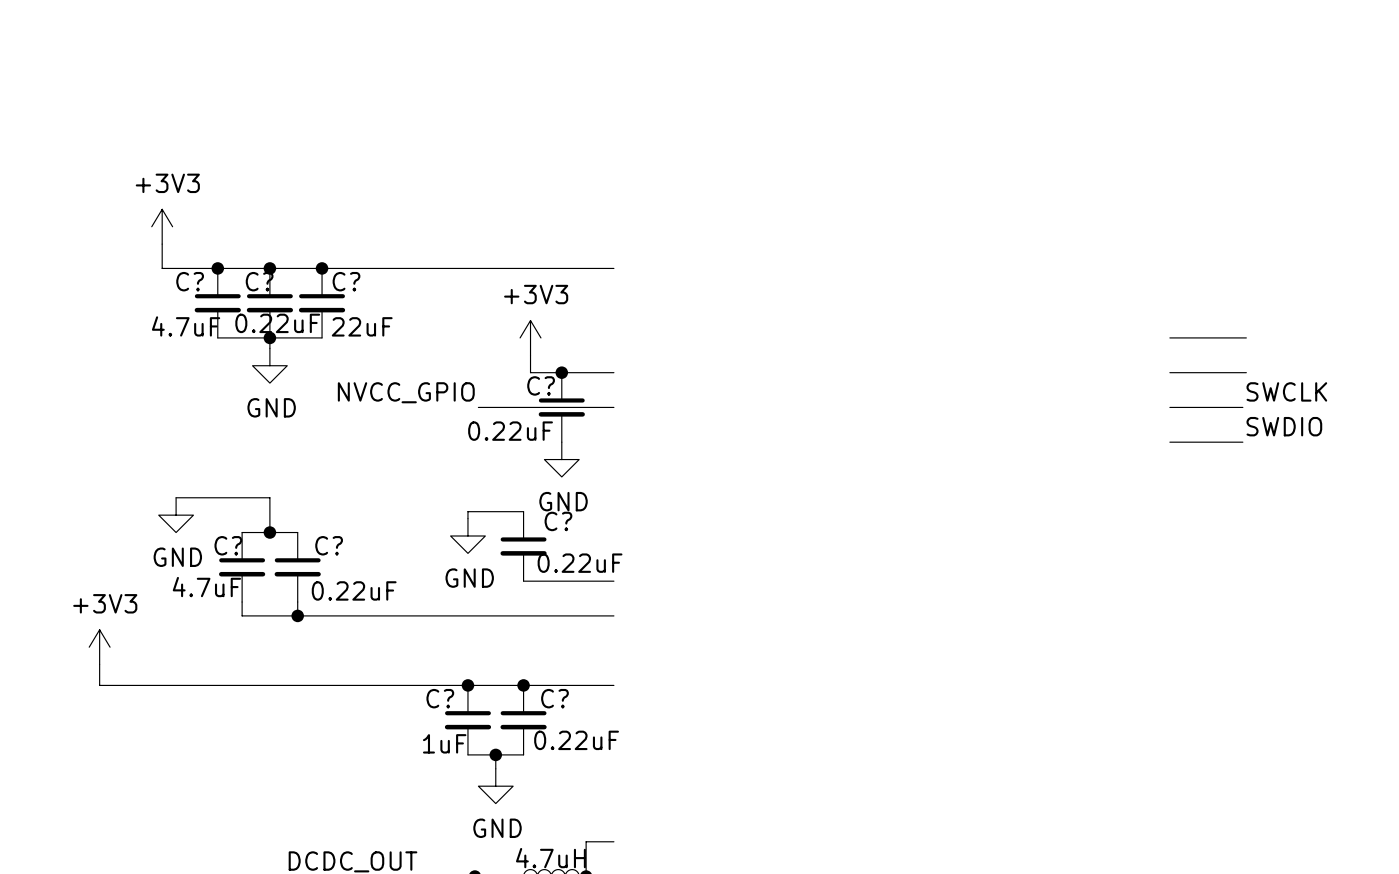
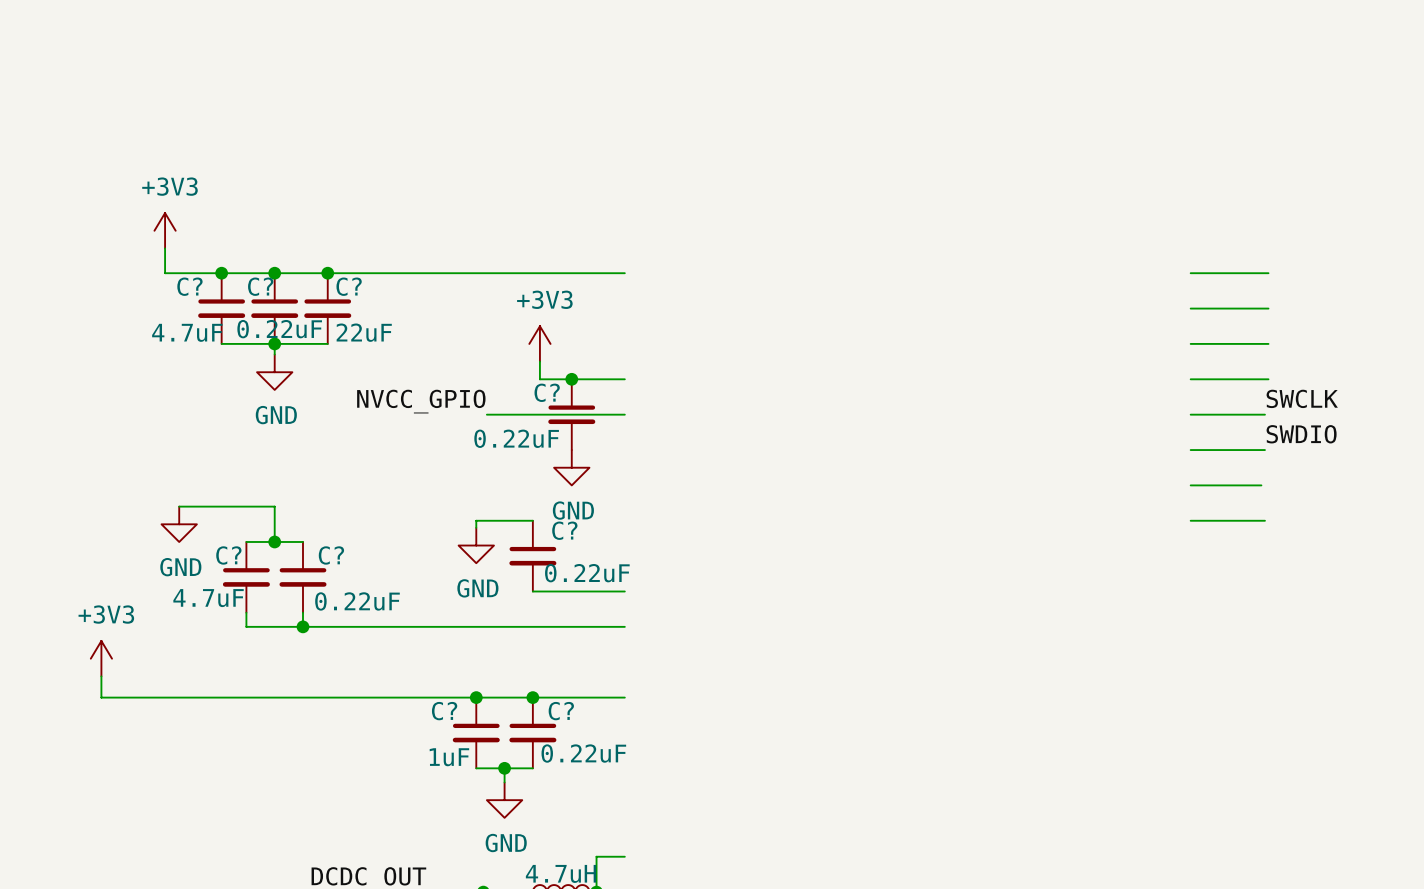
wire: none -> (1190, 273) (1268, 273)
wire: none -> (1190, 308) (1268, 308)
wire: none -> (1190, 485) (1261, 485)
wire: none -> (1190, 520) (1264, 520)

